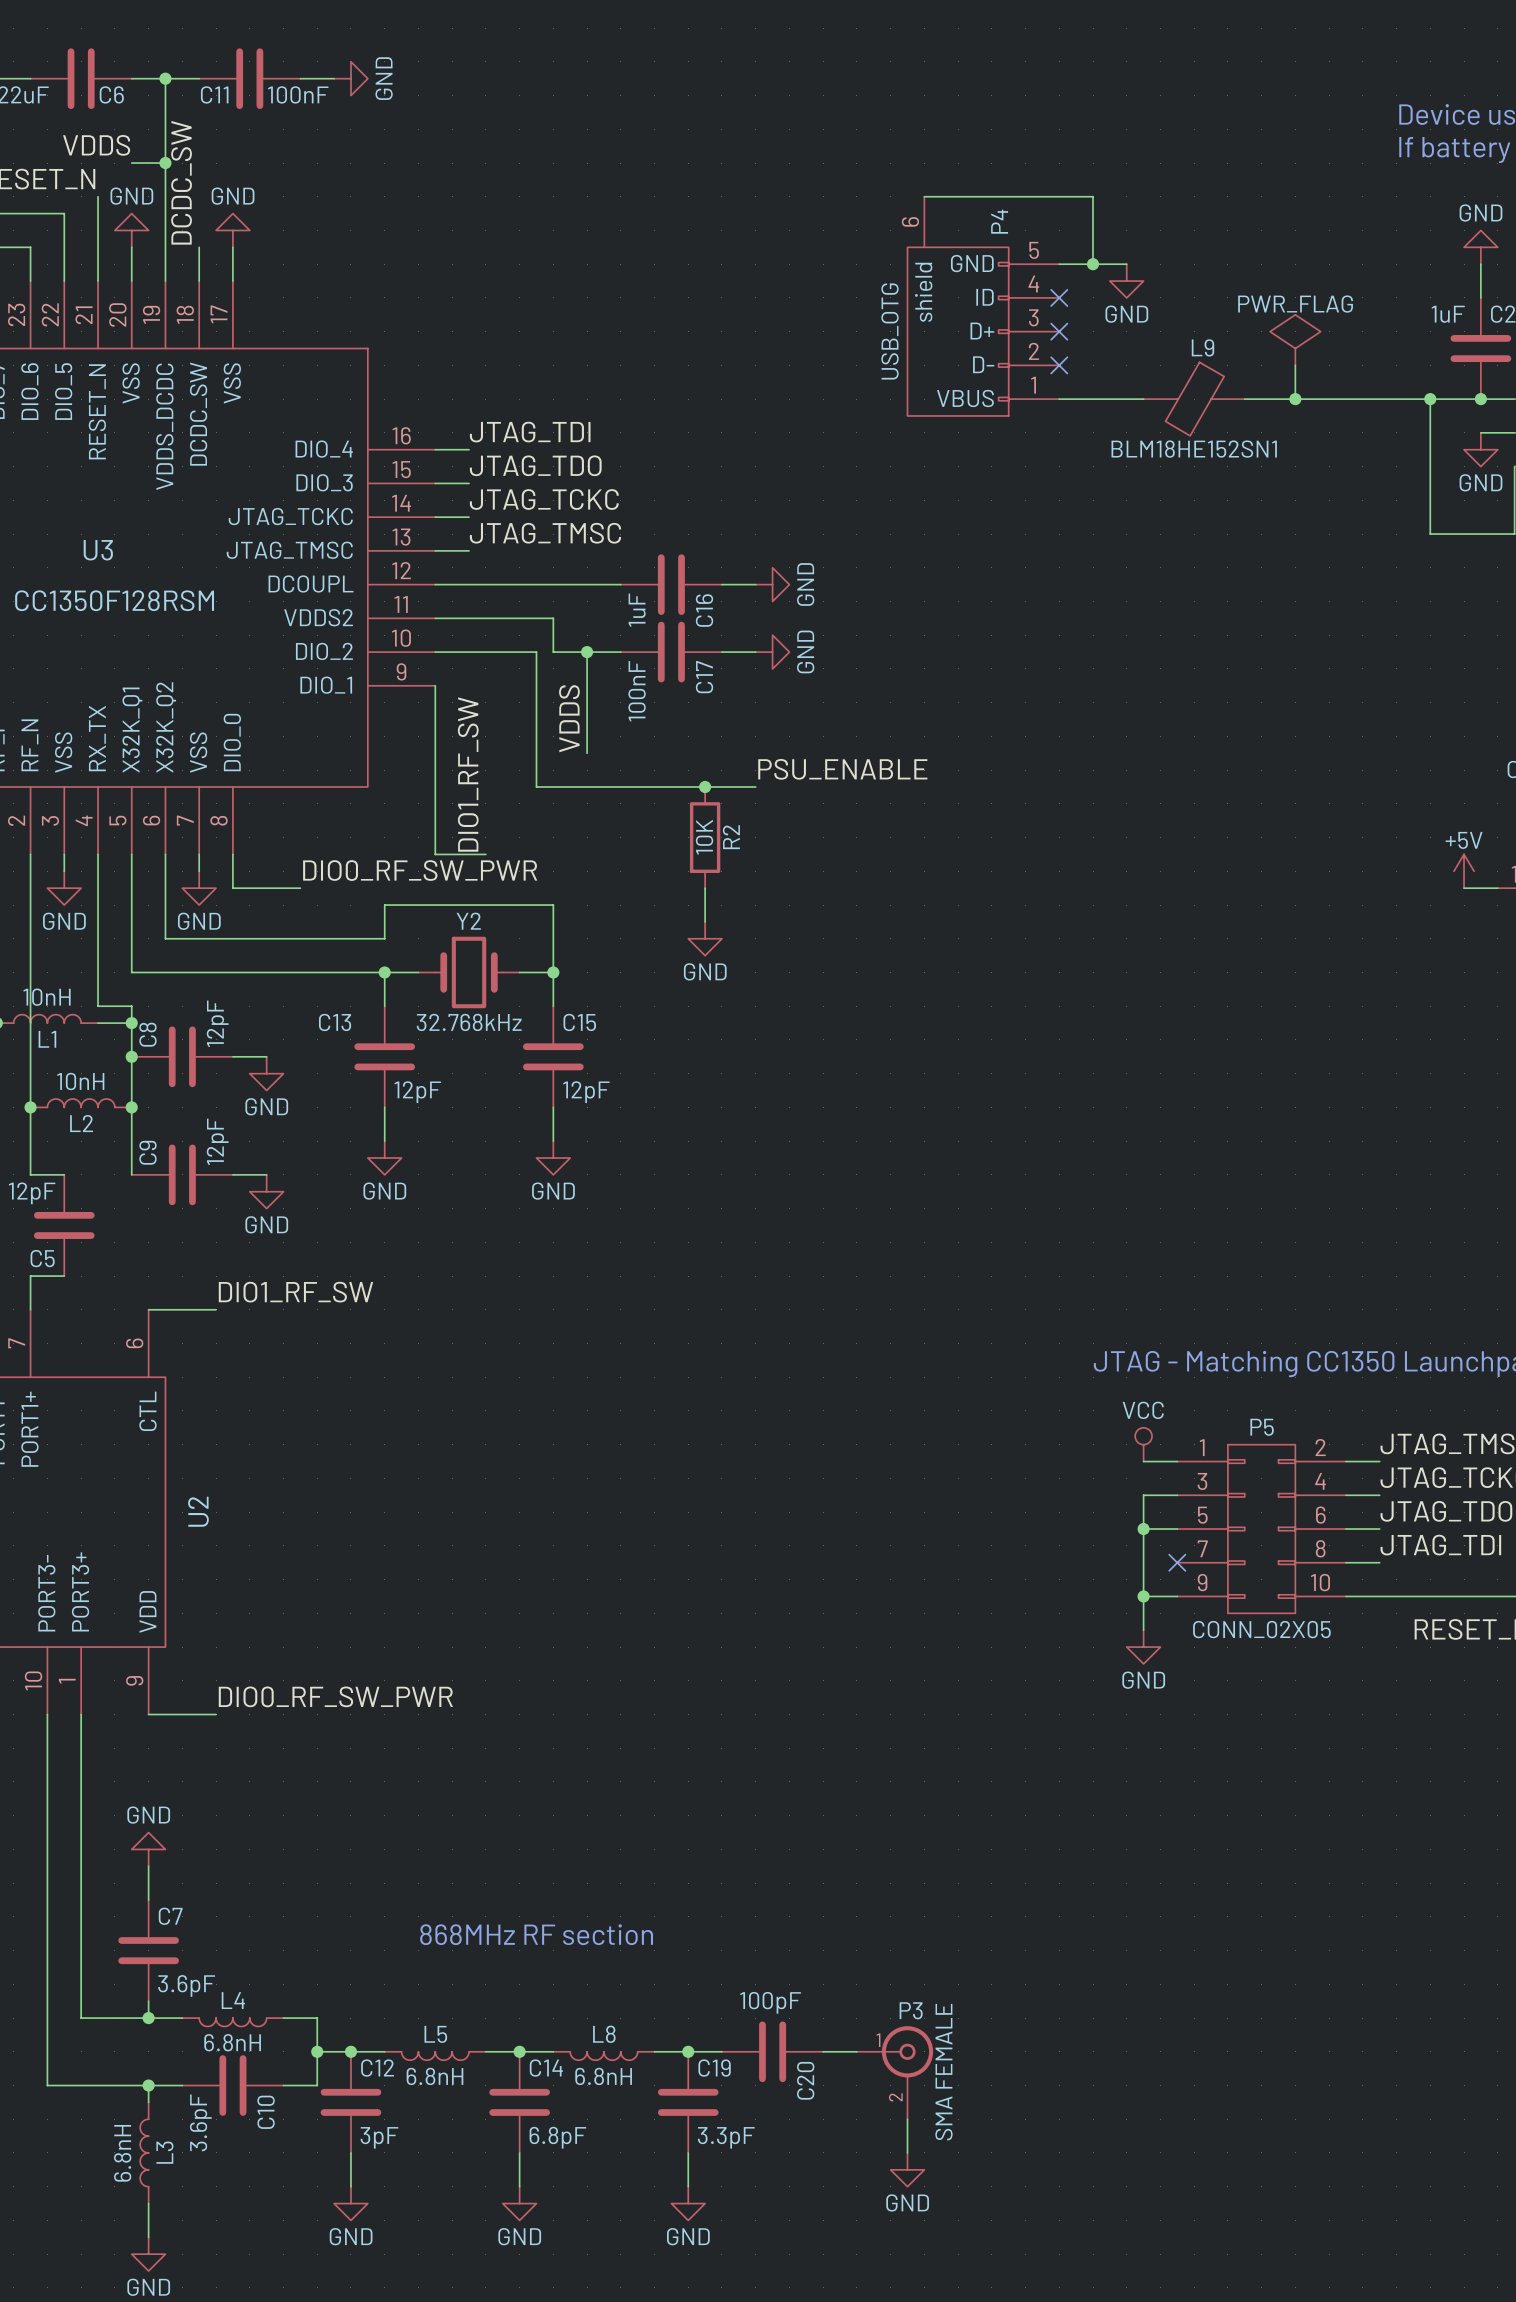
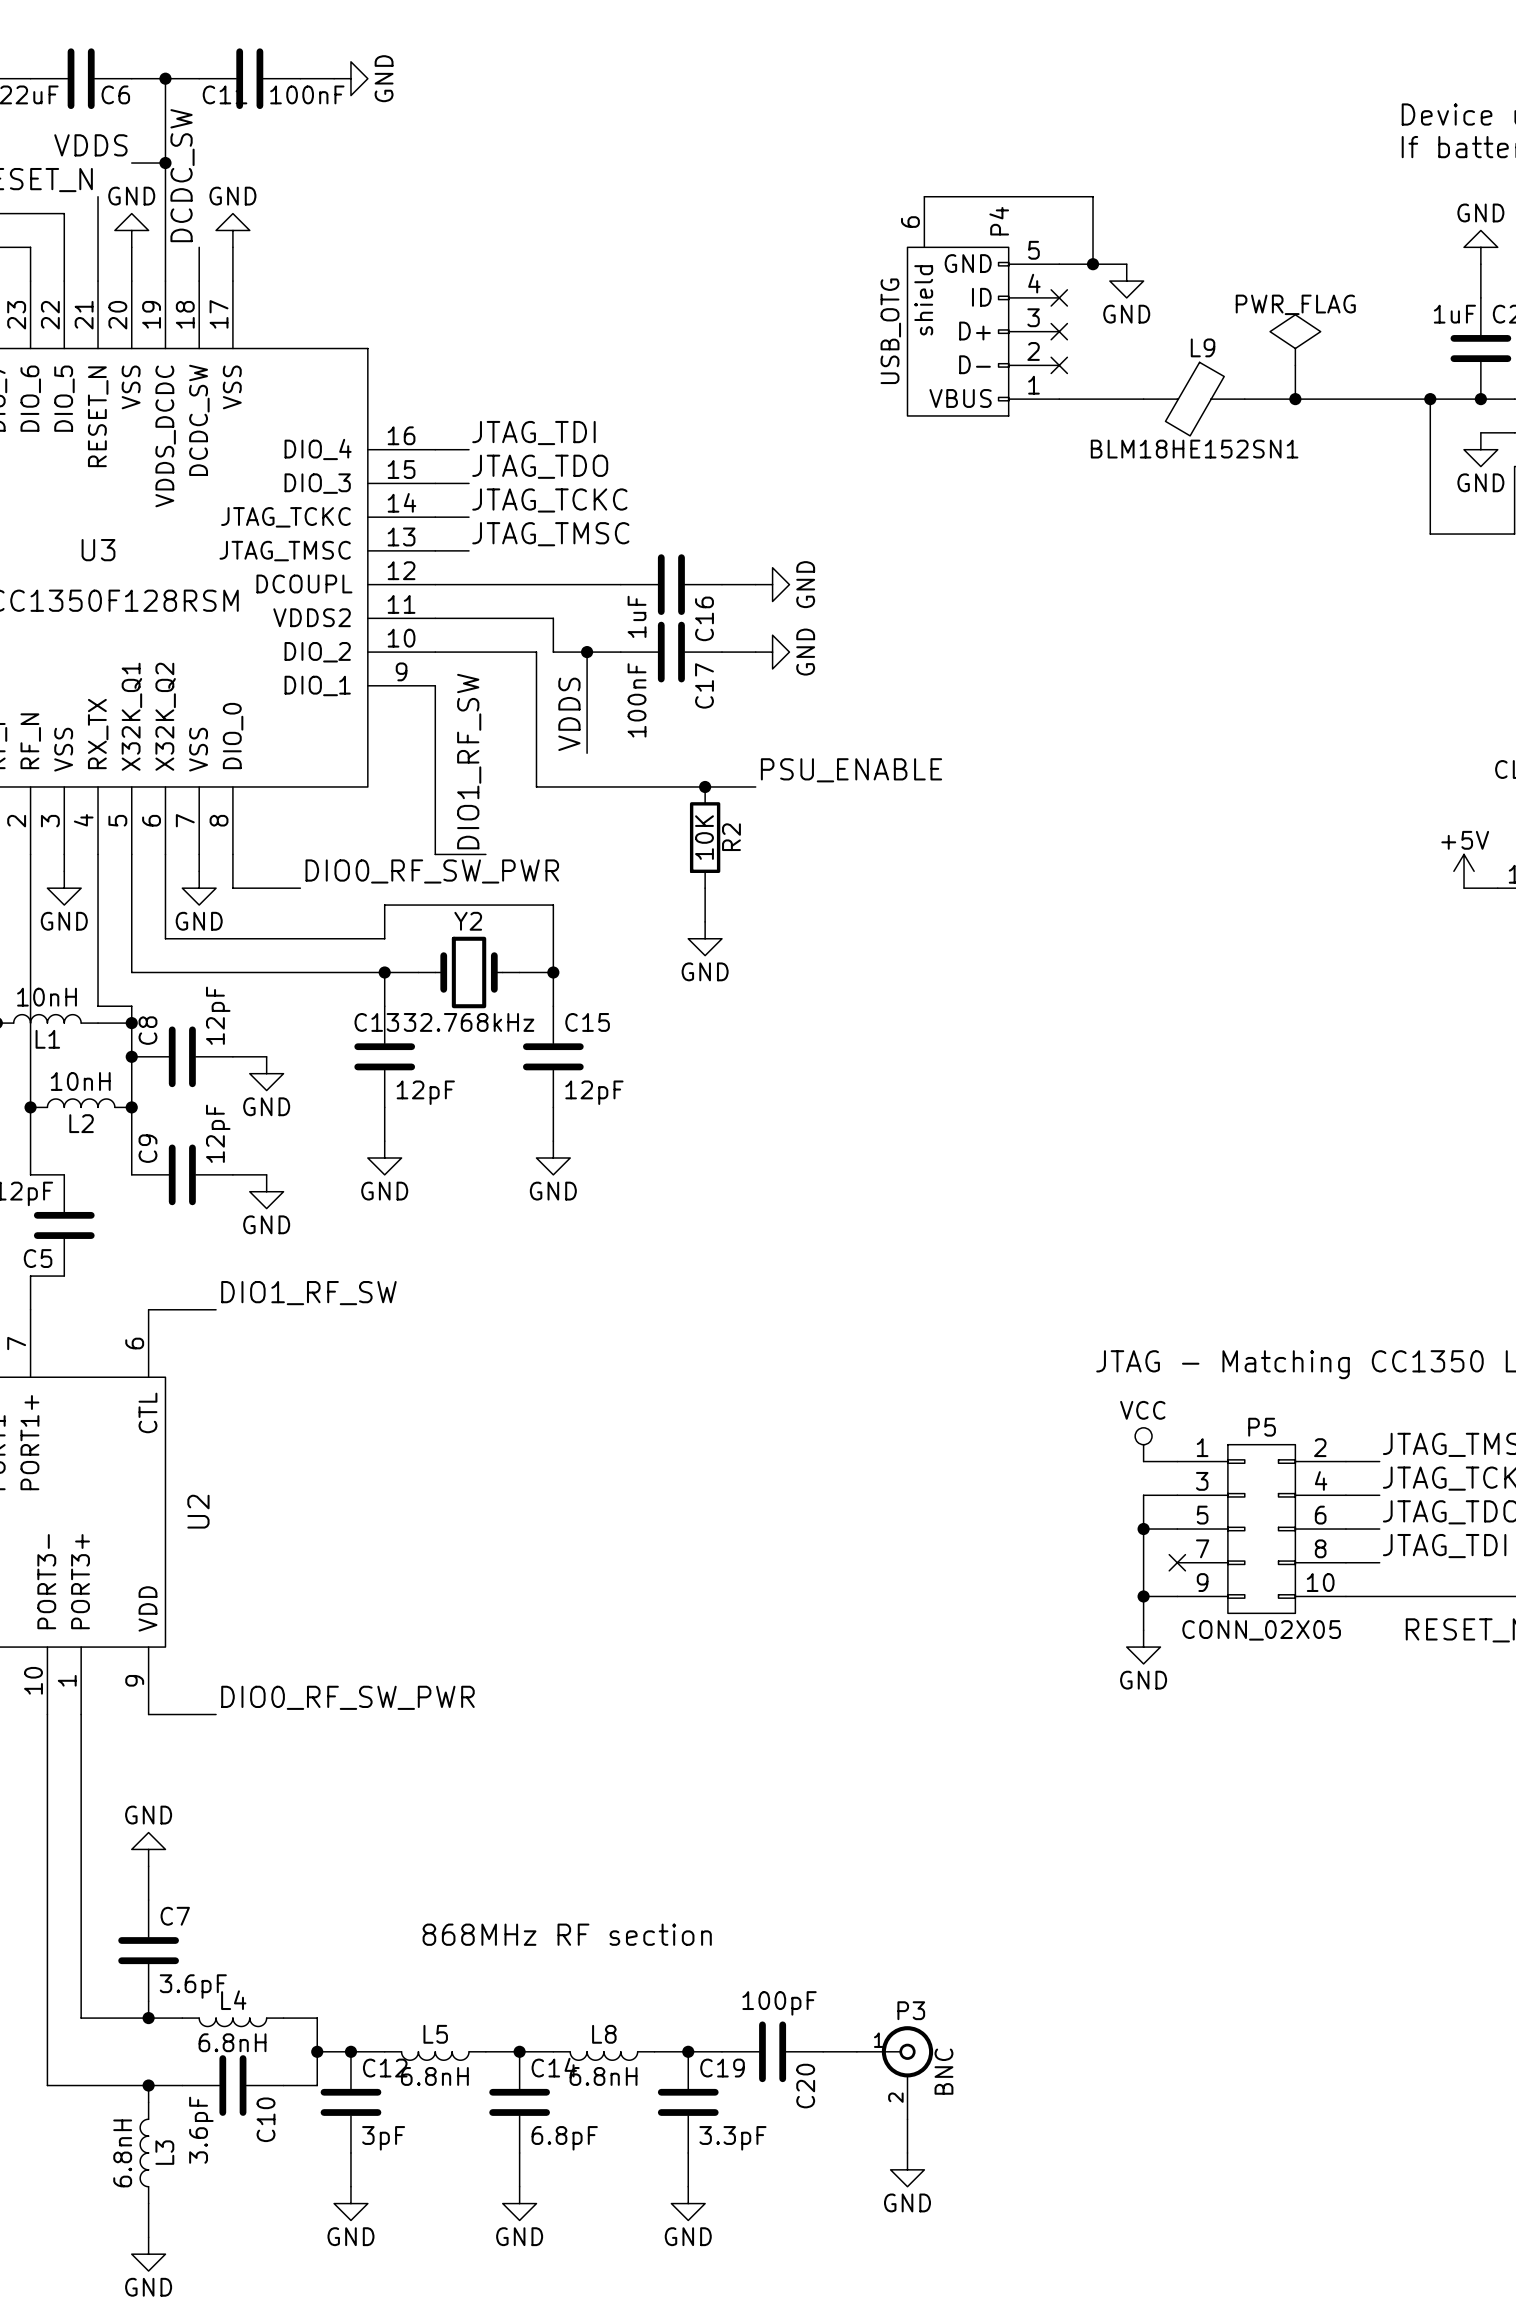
C13 name position: C13 (335, 1022) -> C13 (376, 1022)
P3 value: SMA FEMALE (943, 2072) -> BNC (943, 2071)

